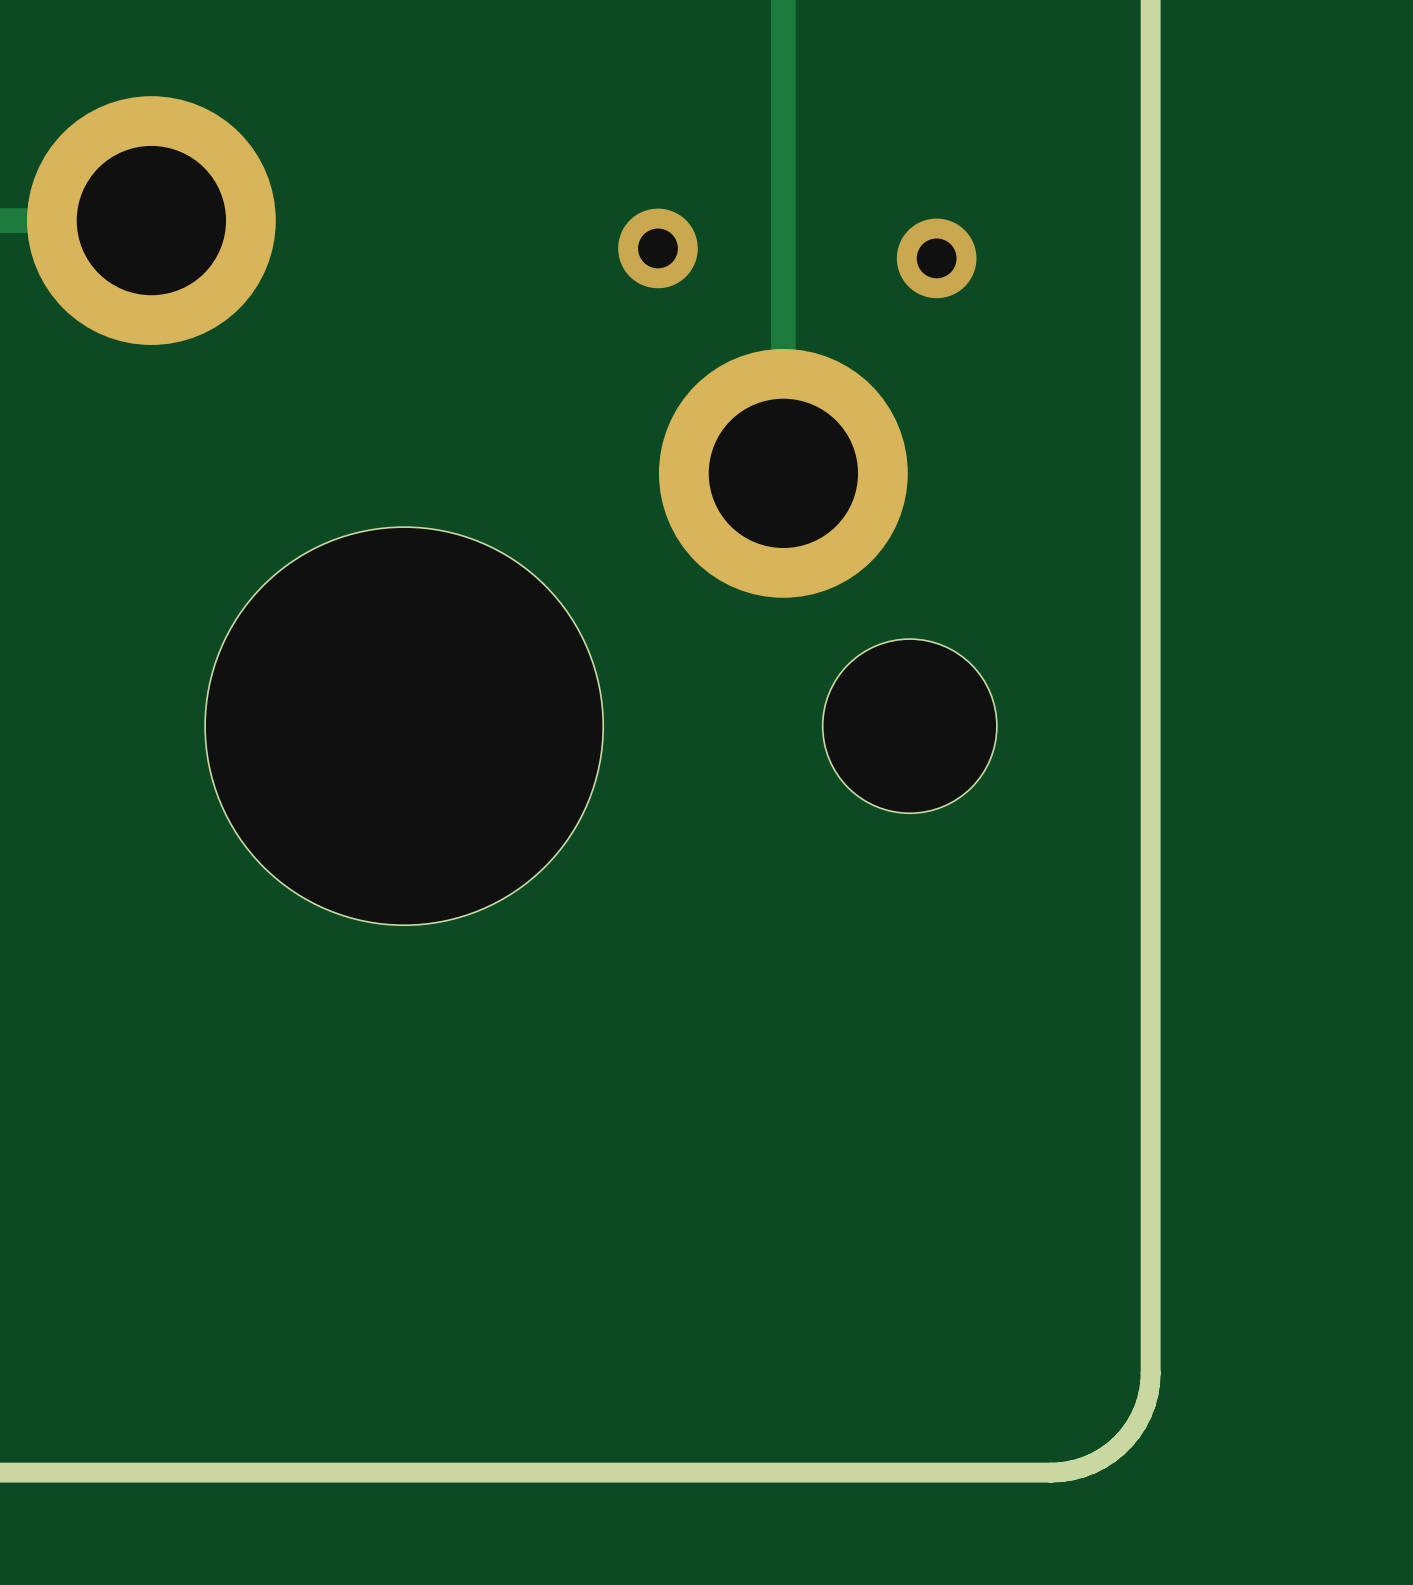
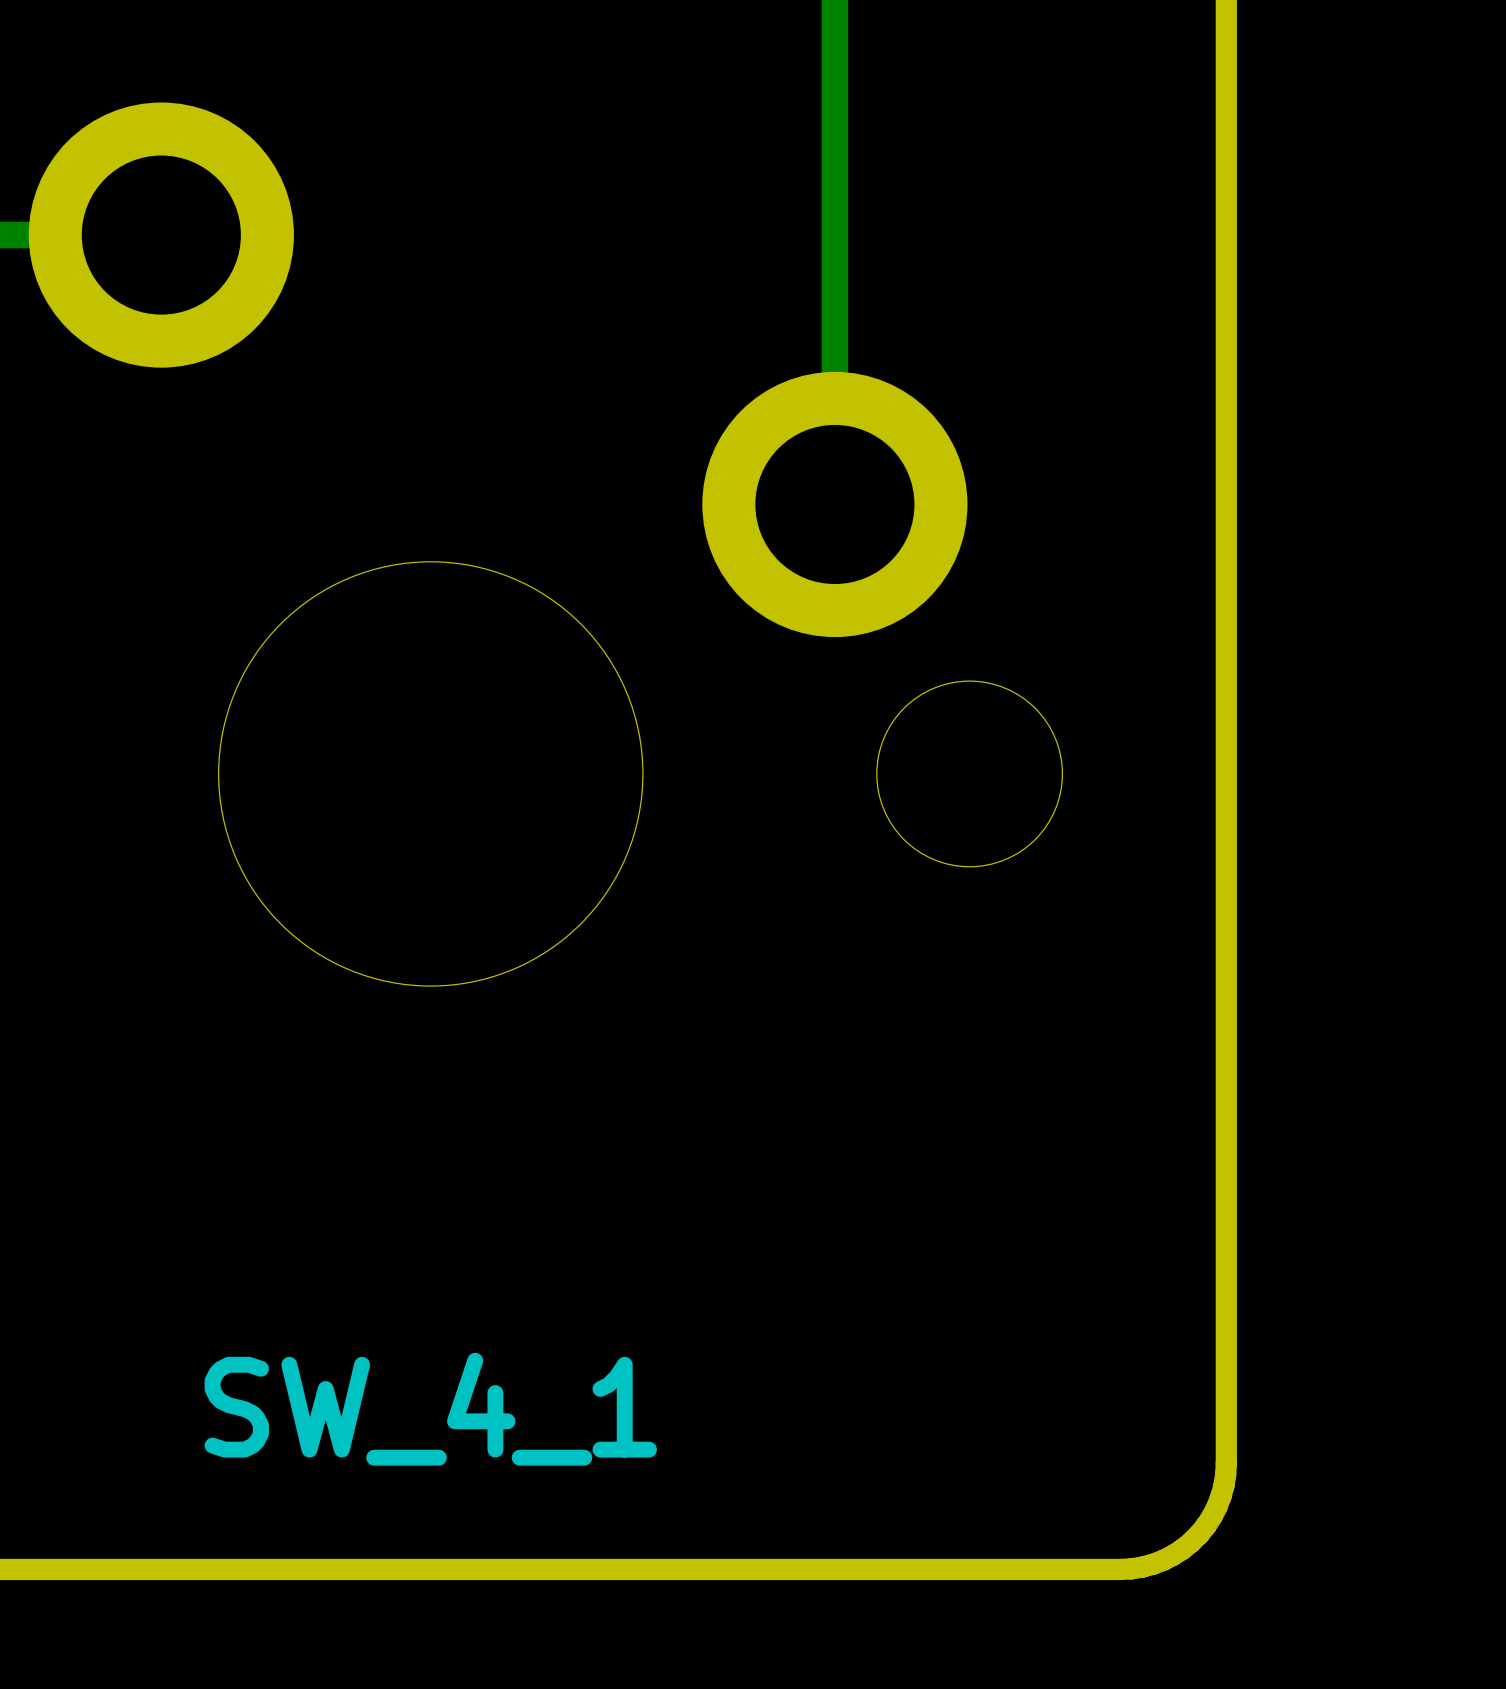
via: (657, 248) -> none
via: (936, 258) -> none
SW_4_1 name: none -> SW_4_1 (430, 1409)

